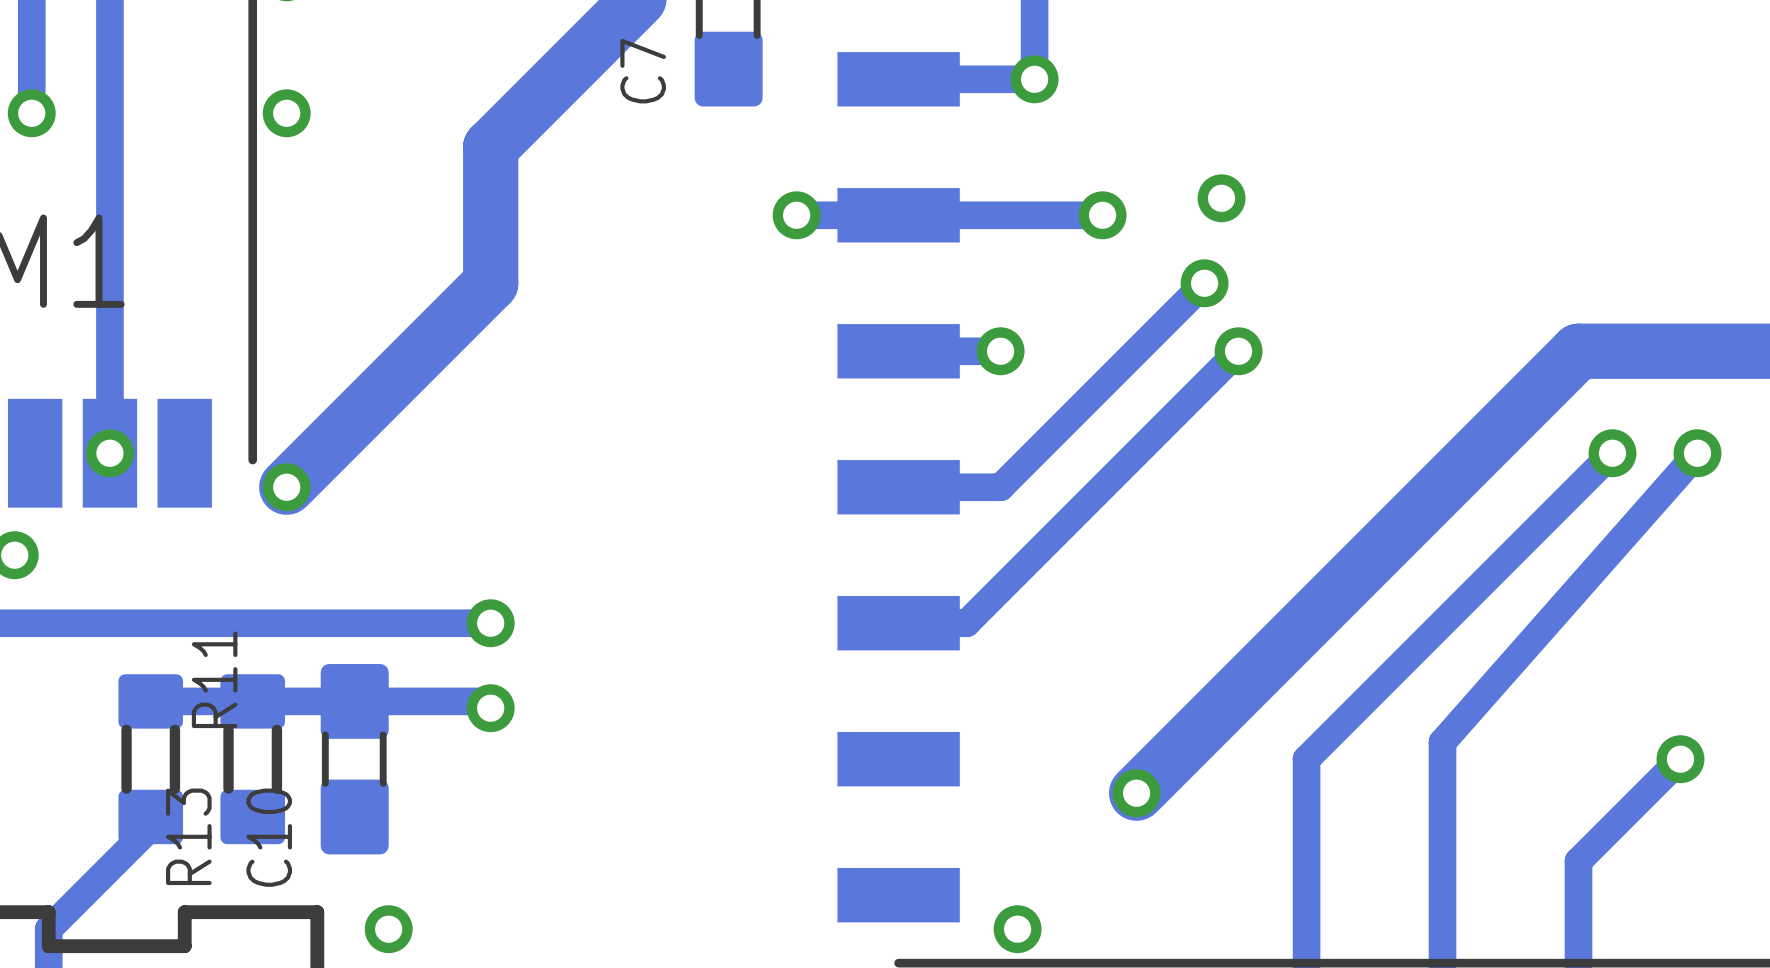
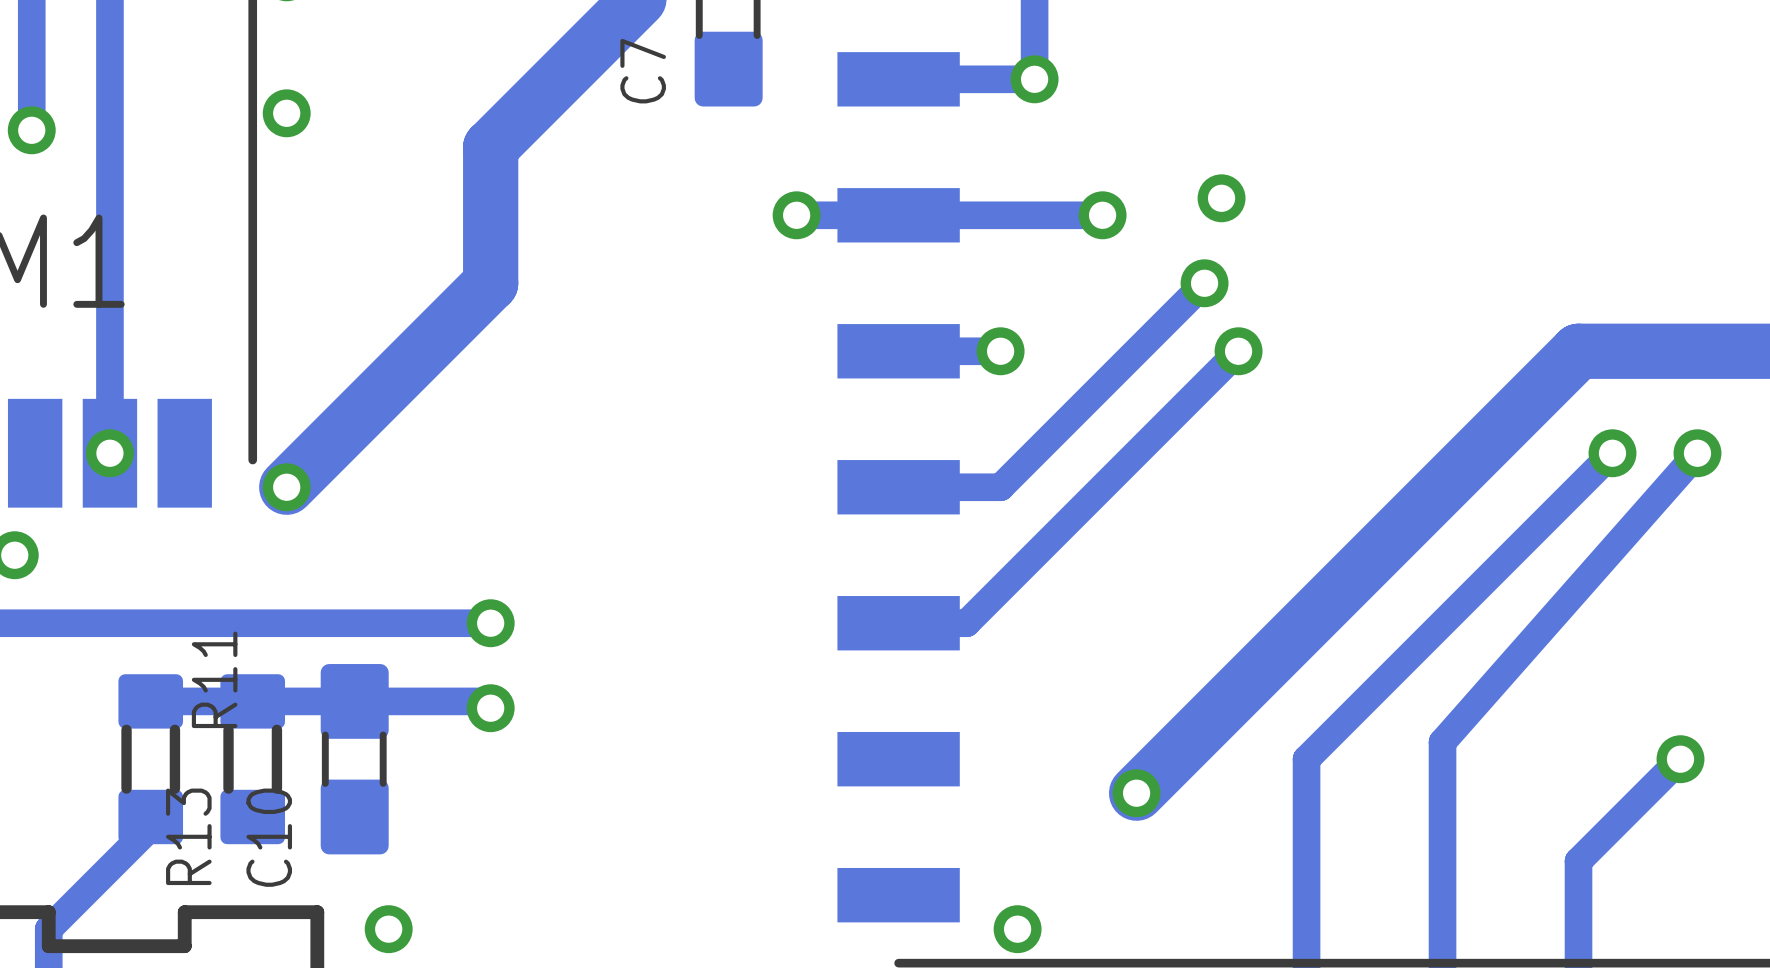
via position: (31, 113) -> (31, 130)

